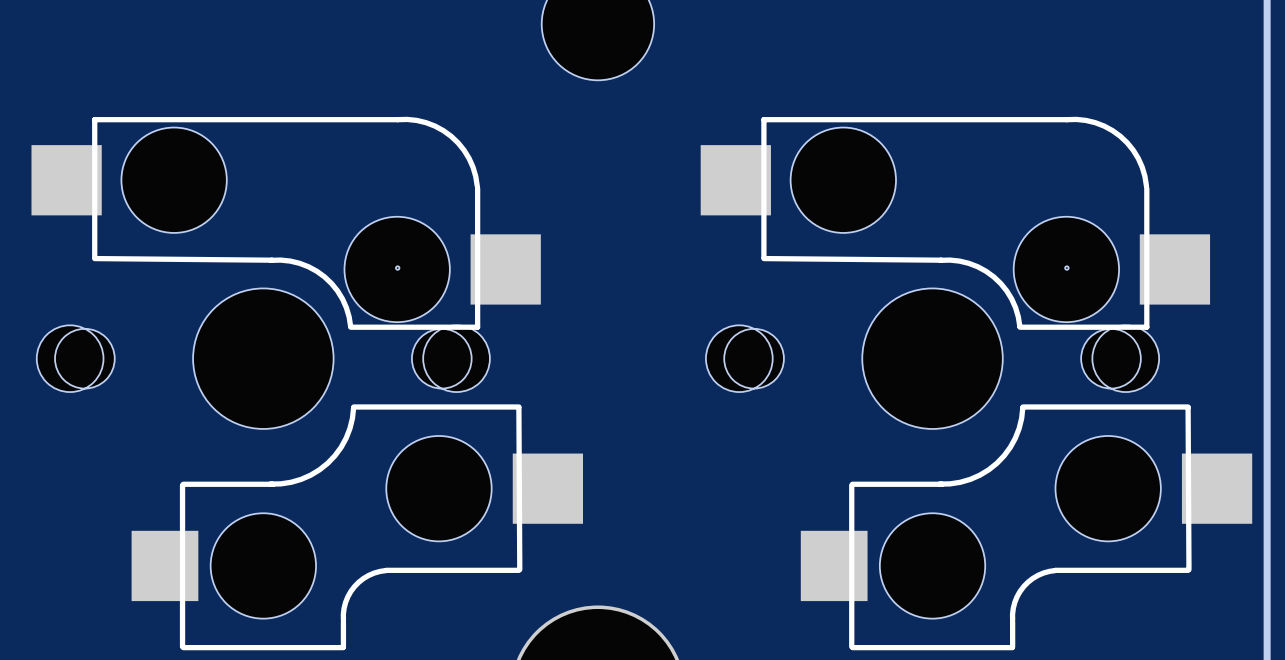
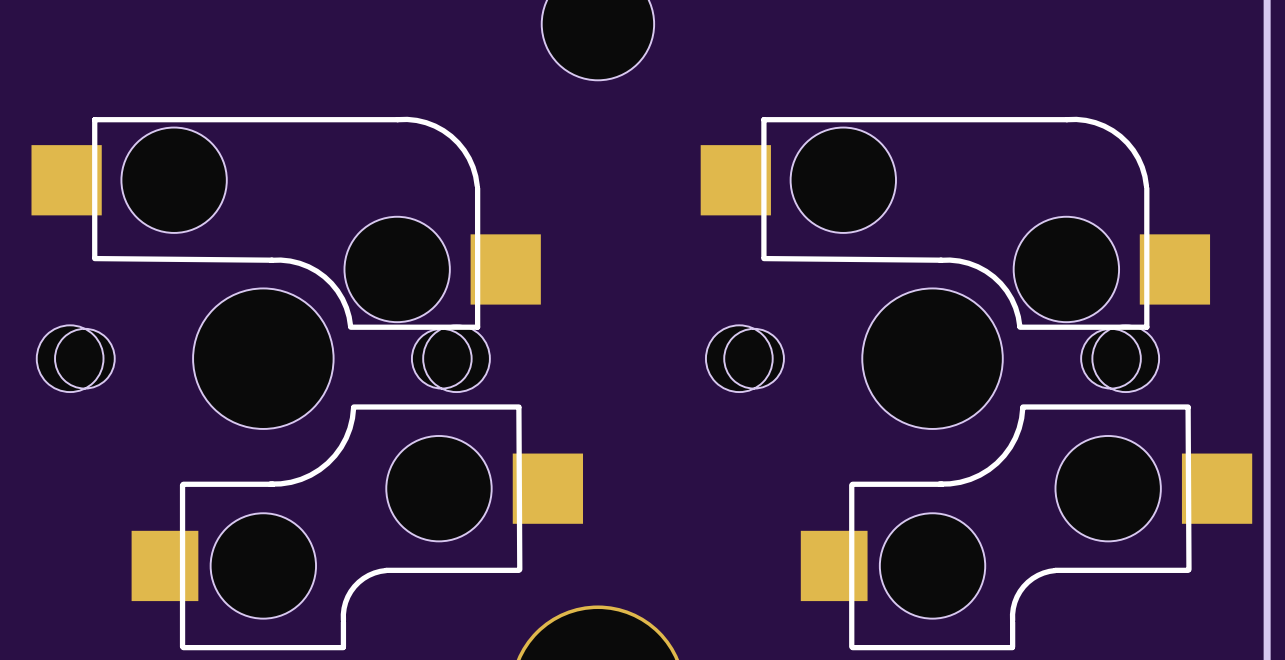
part footprint: [31, 116, 584, 651] -> [31, 116, 584, 651]
part footprint: [700, 116, 1253, 651] -> [700, 116, 1253, 651]

